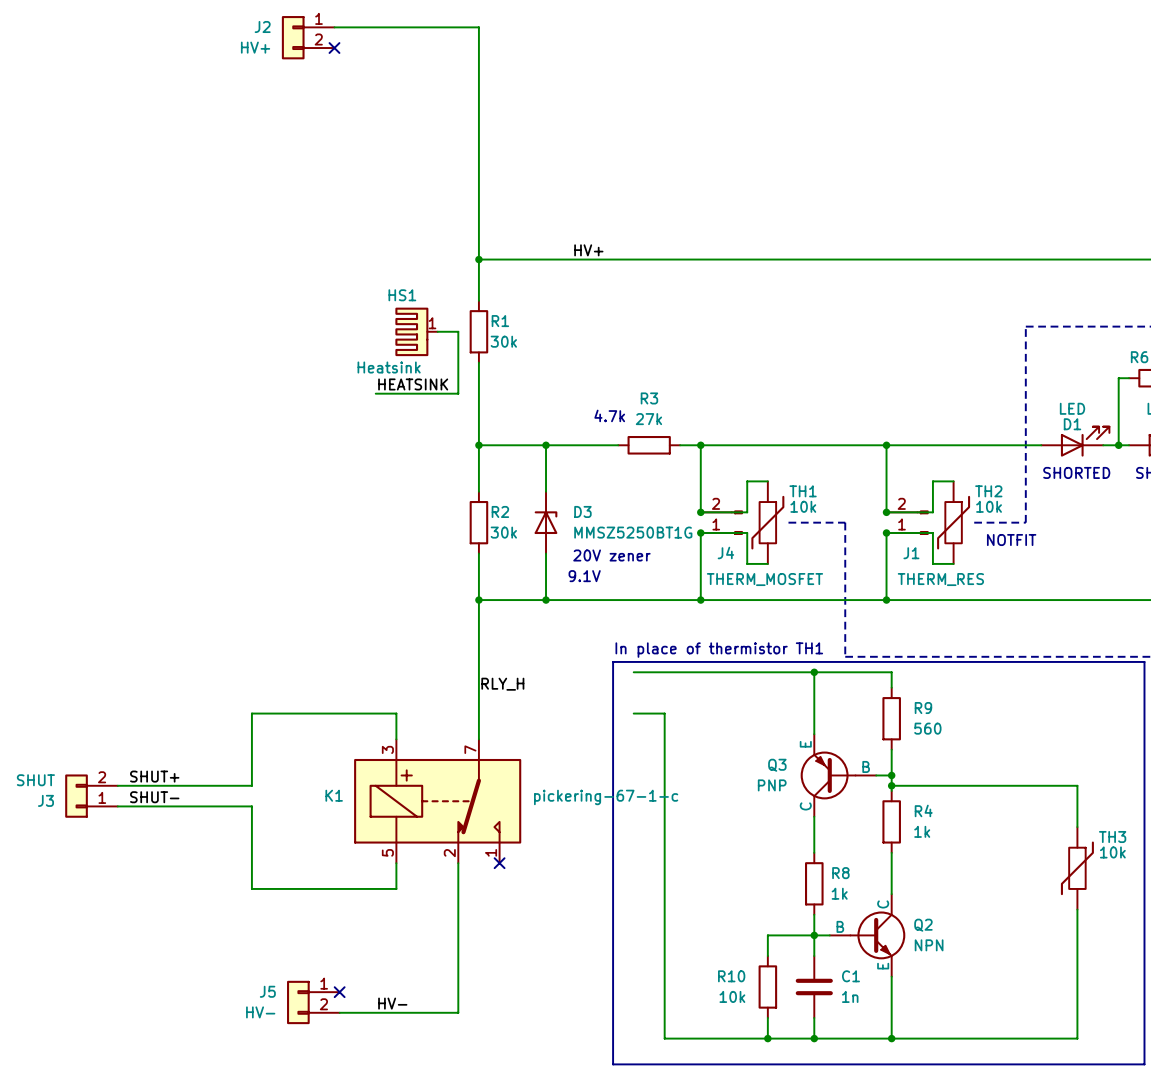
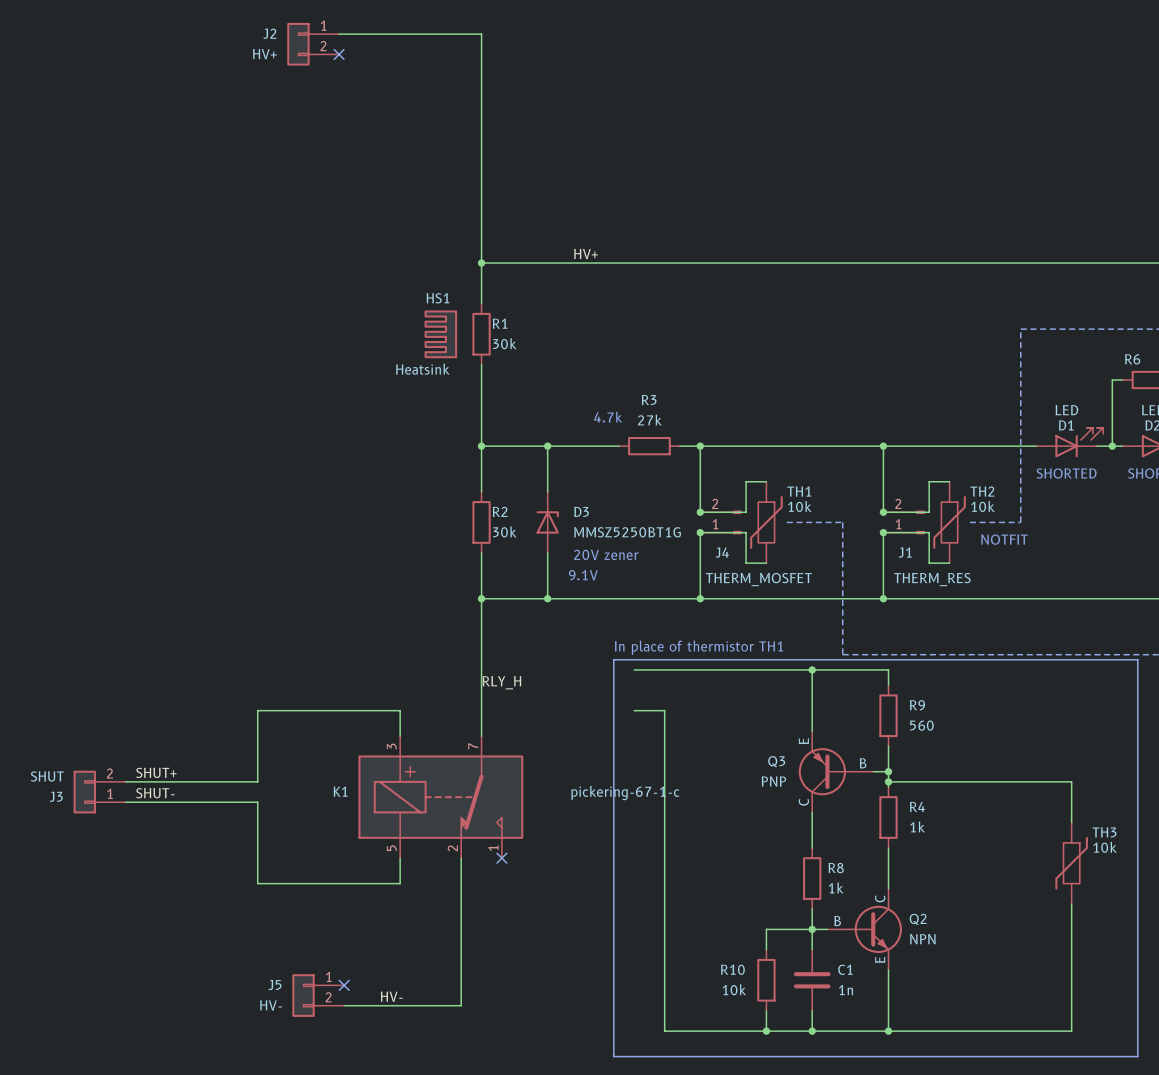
HS1 symbol: [395, 307, 438, 357] -> [424, 310, 458, 359]
wire: (437, 331) (458, 331) (458, 393) (375, 393) -> none
label: HEATSINK (413, 384) -> none

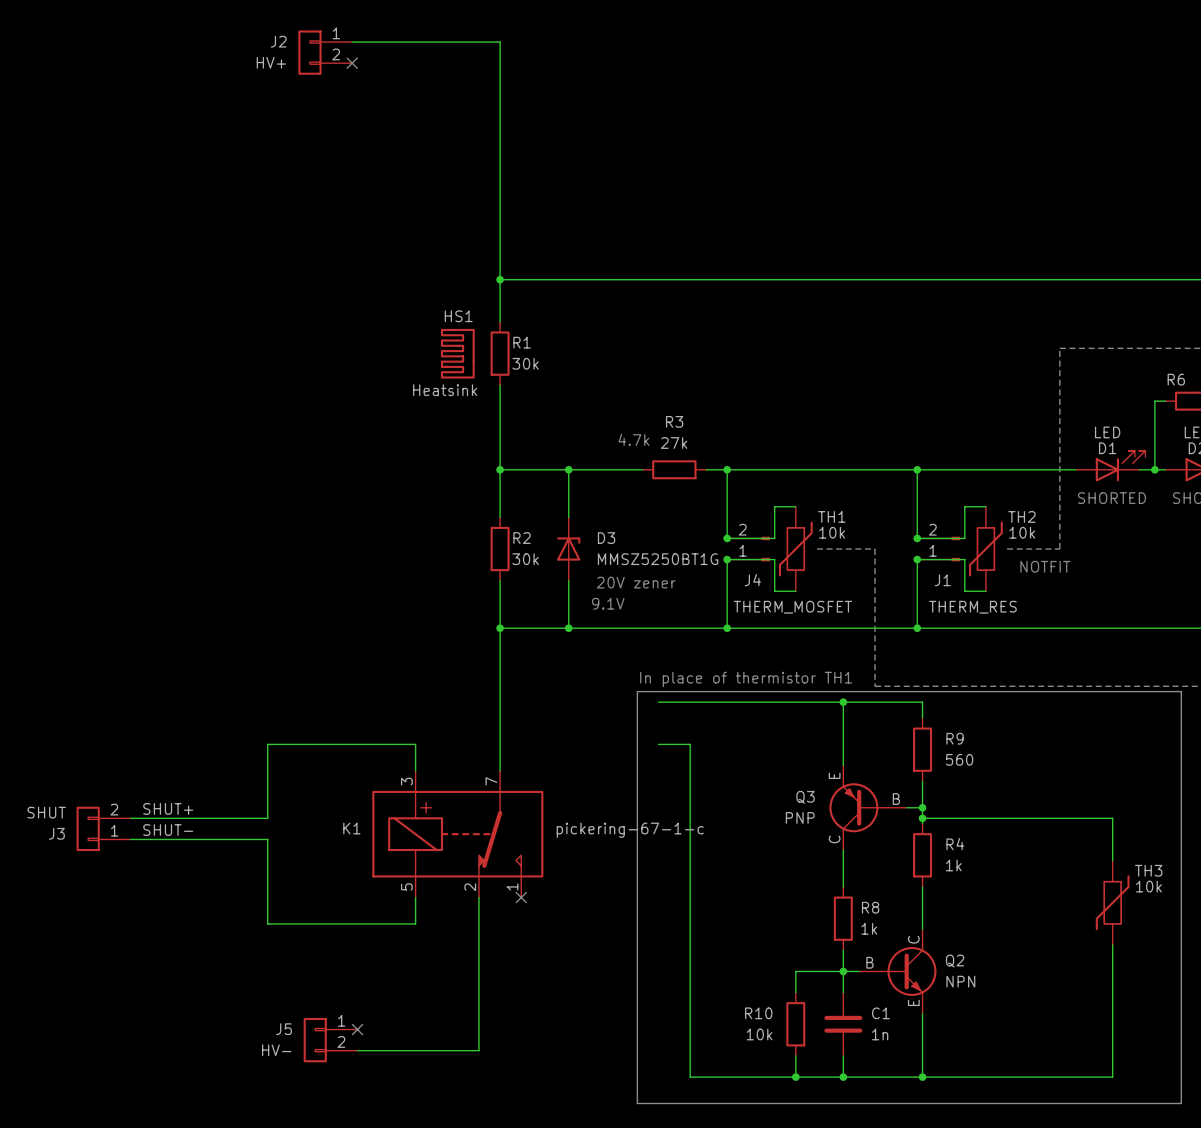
label: HV+ (586, 254) -> none
label: RLY_H (501, 682) -> none
label: HV- (391, 996) -> none

